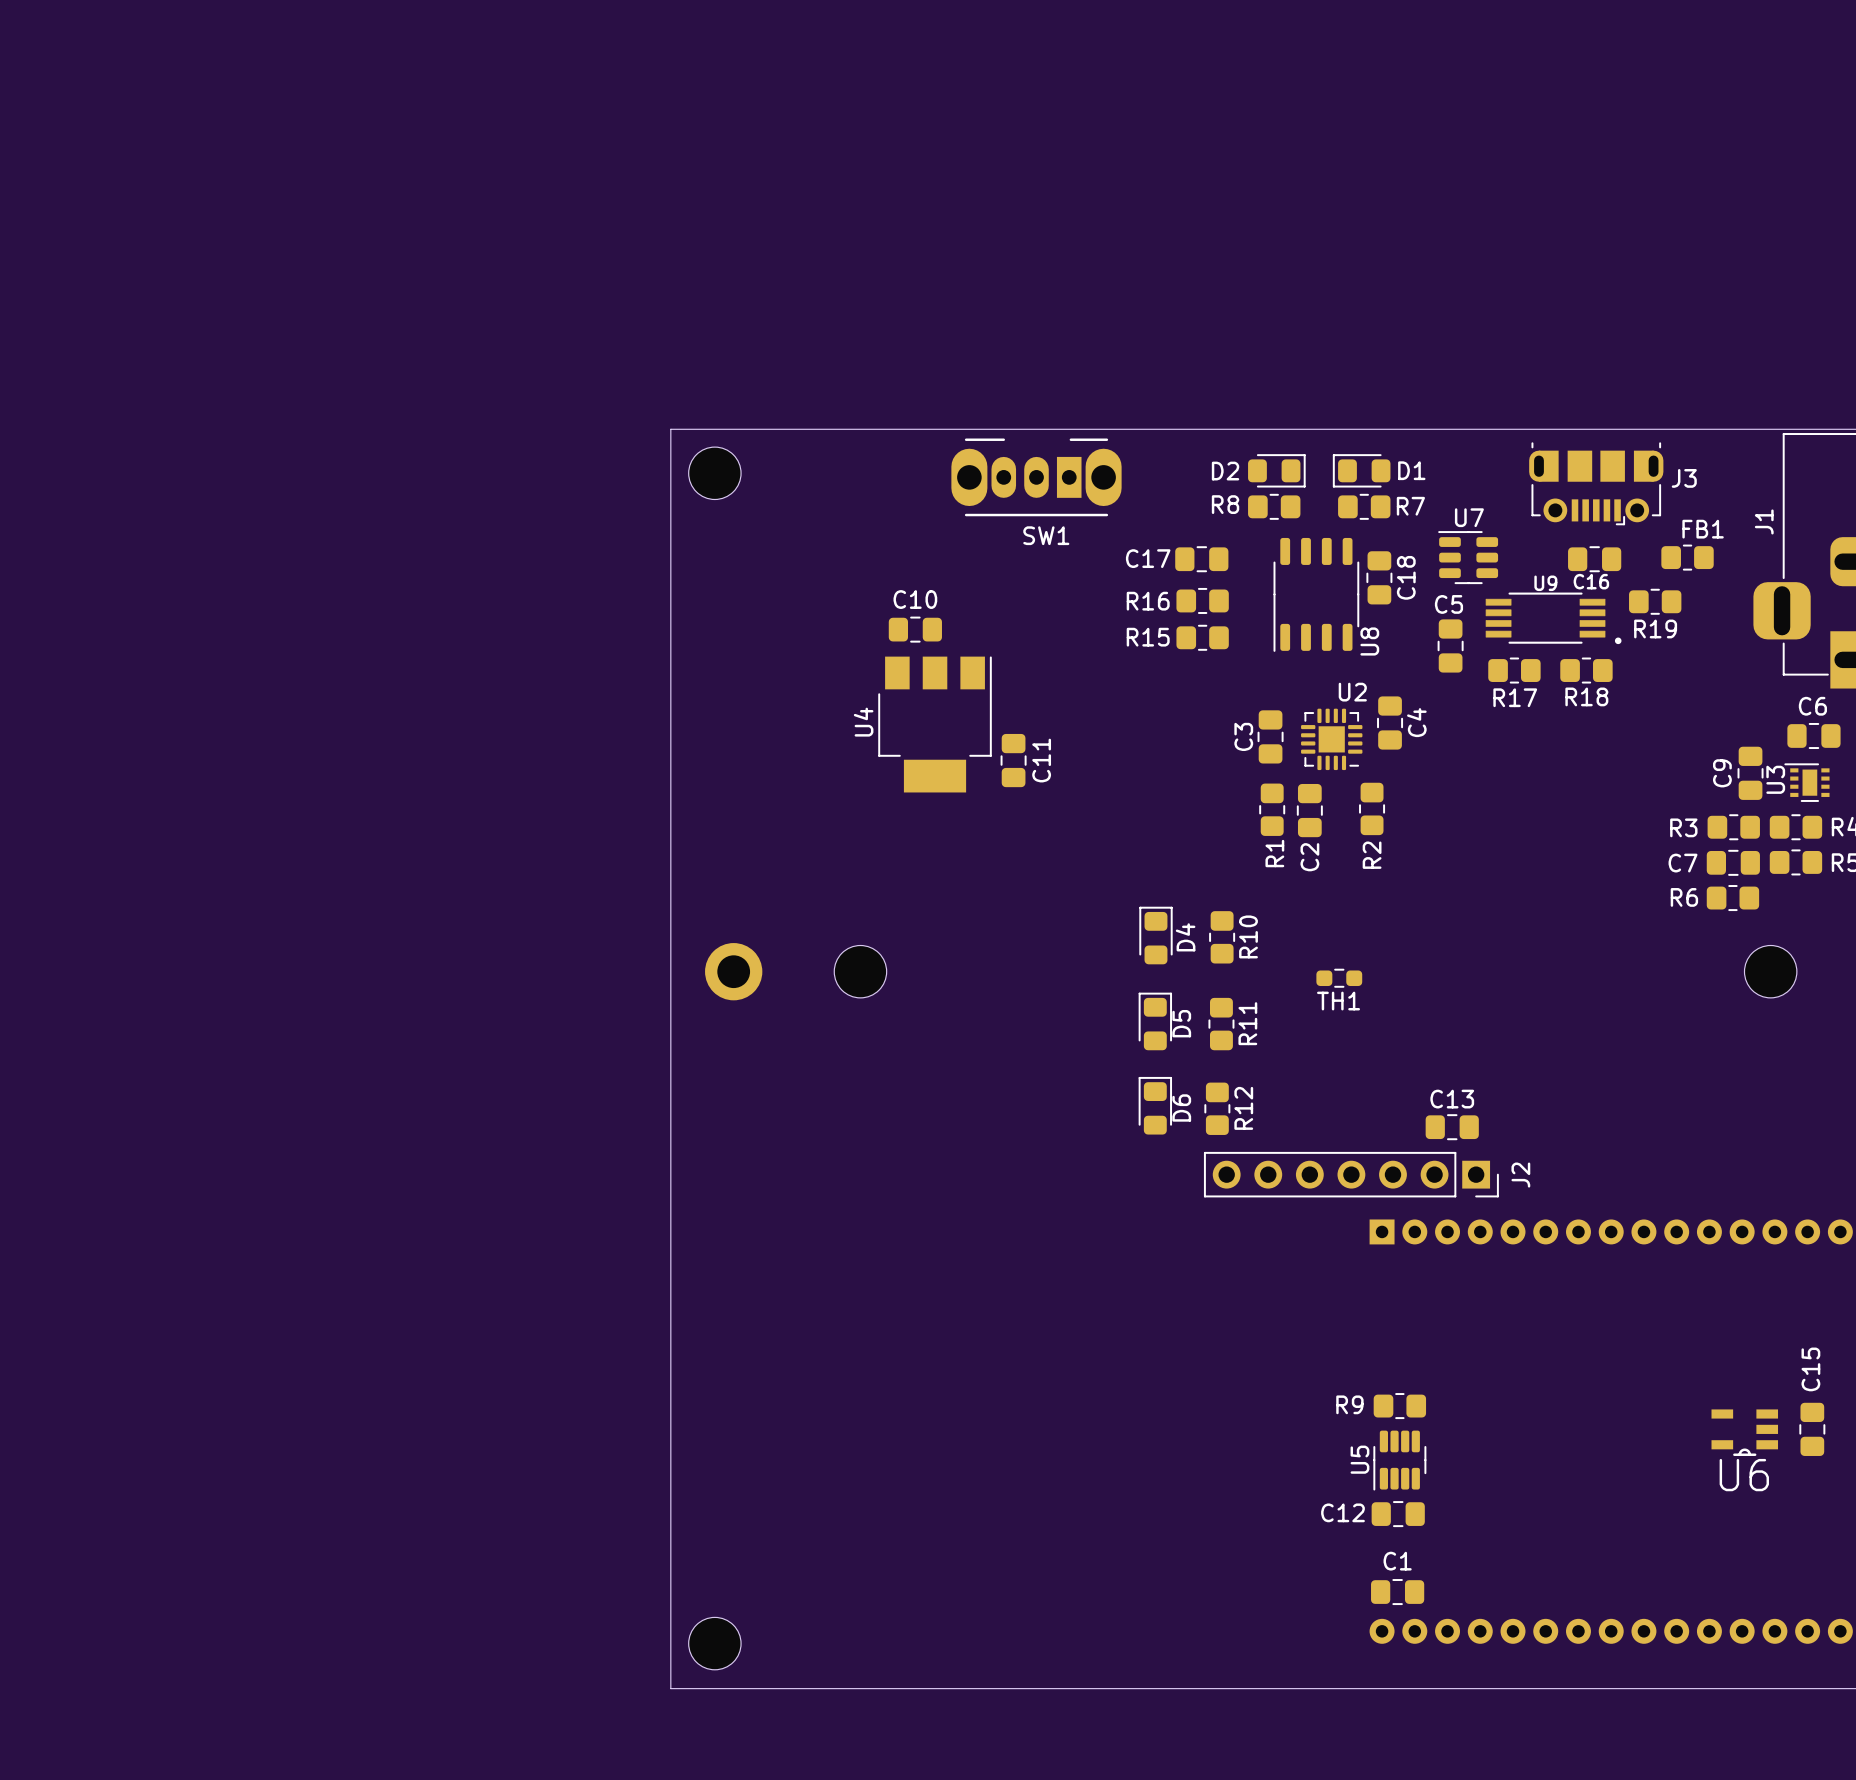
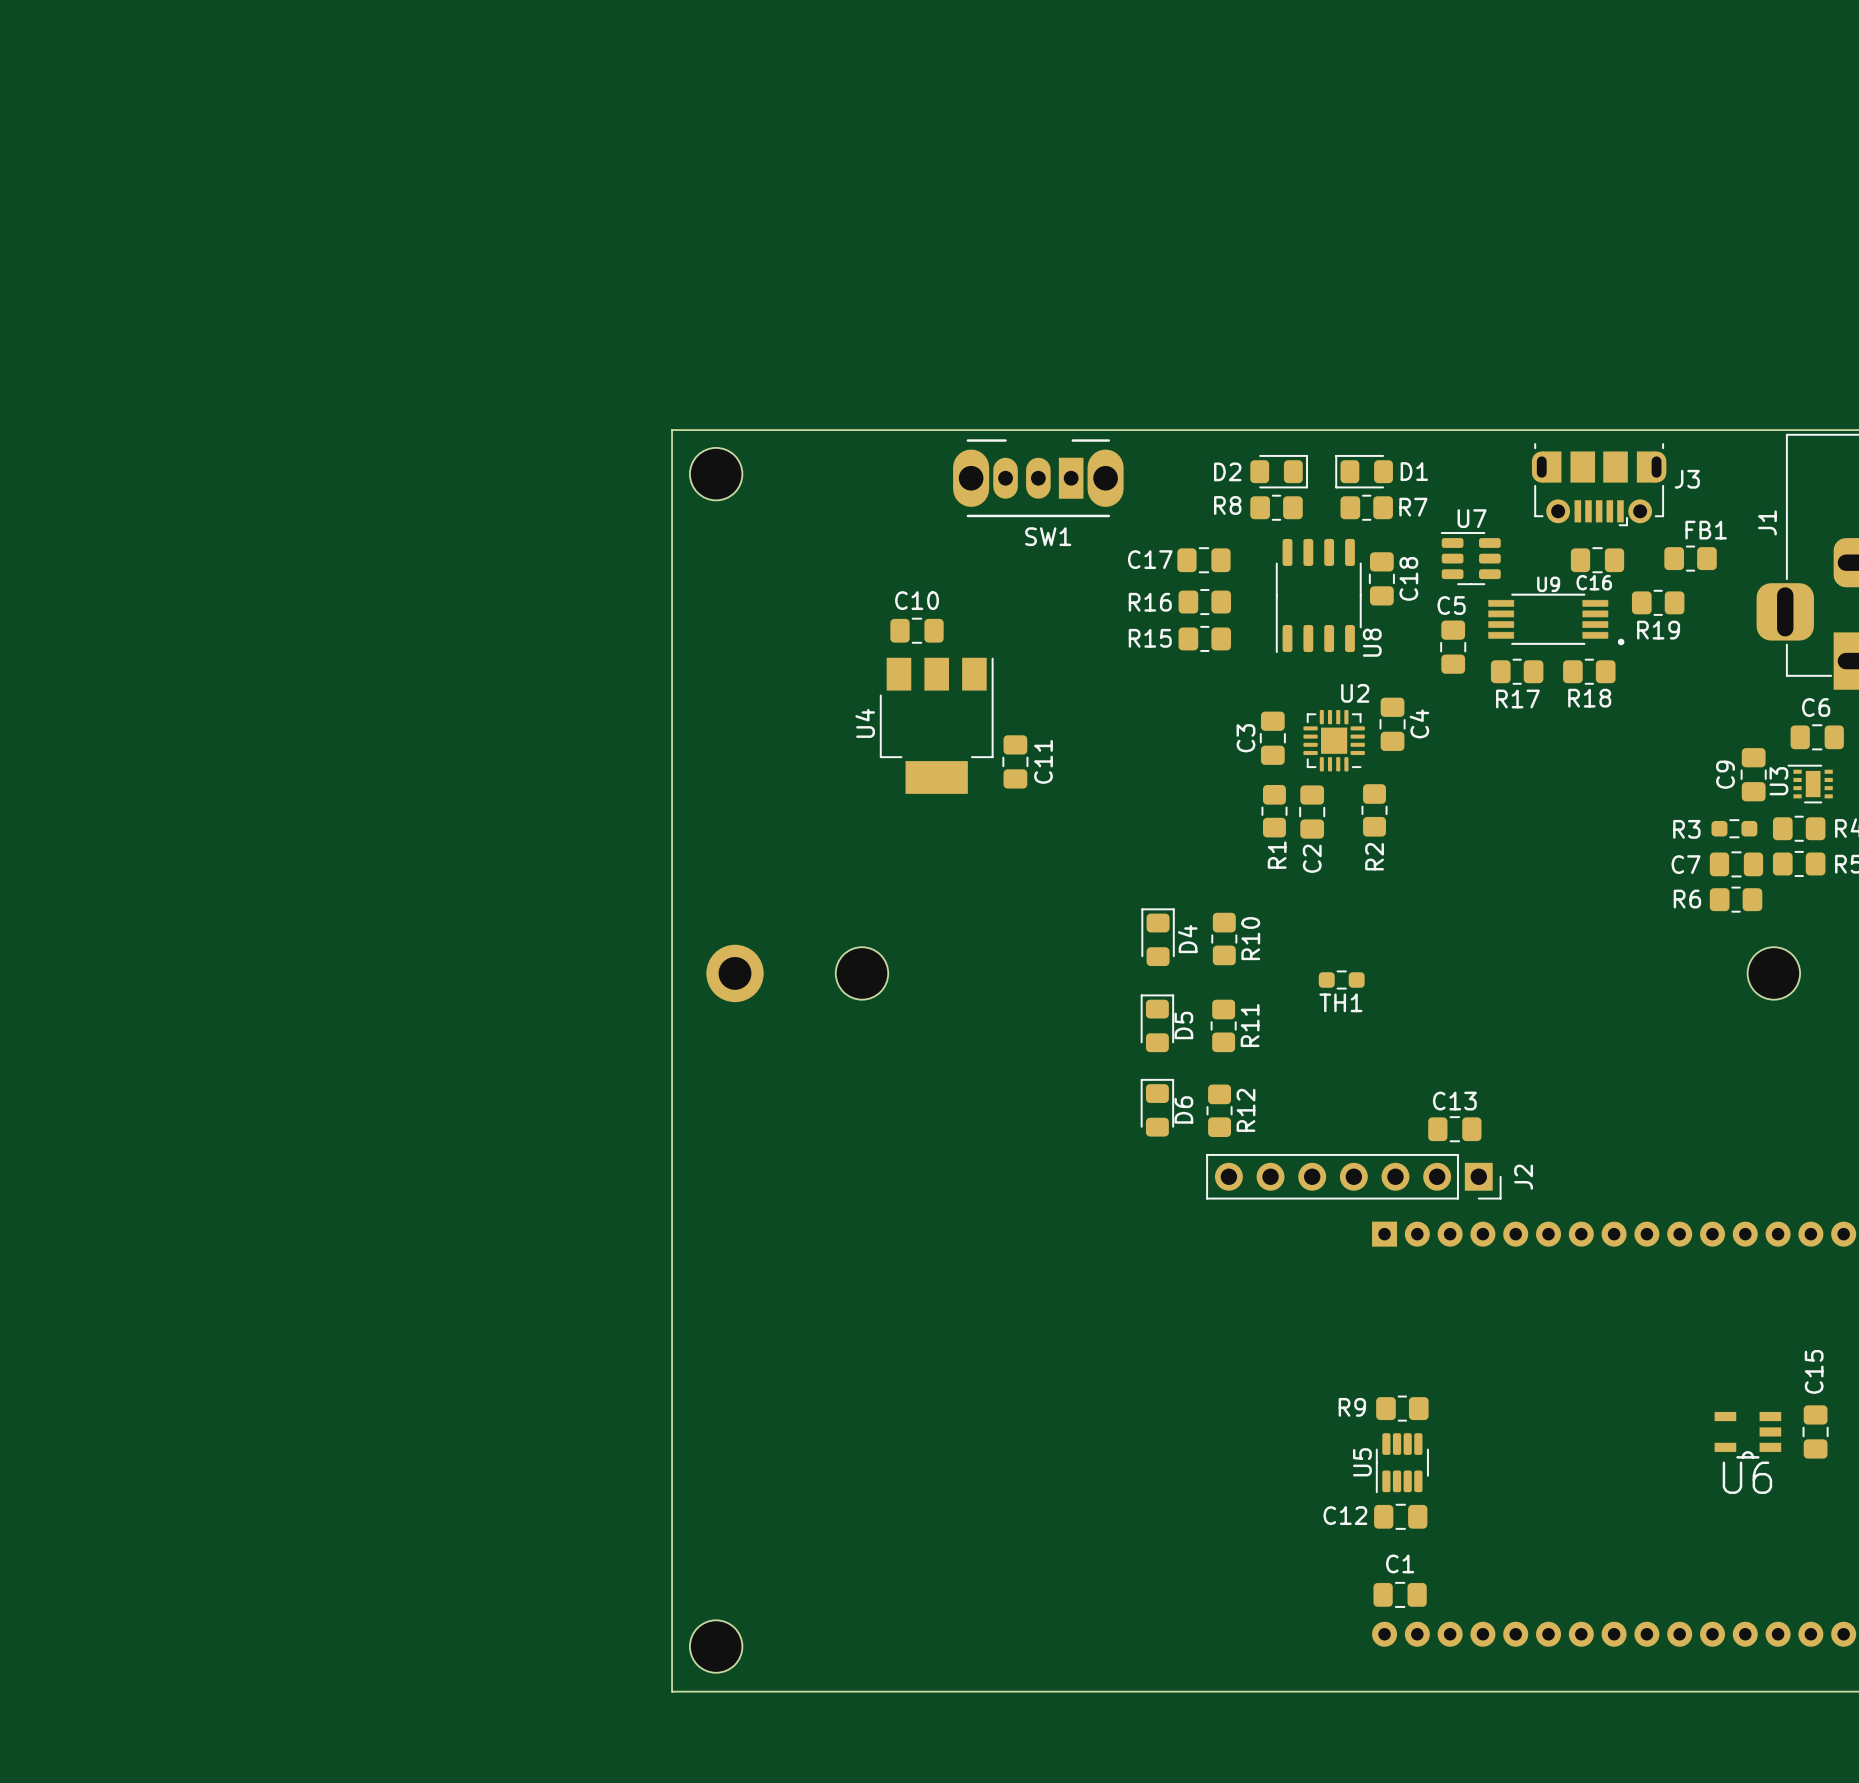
R3 footprint: [1707, 814, 1760, 841] -> [1711, 819, 1758, 839]

